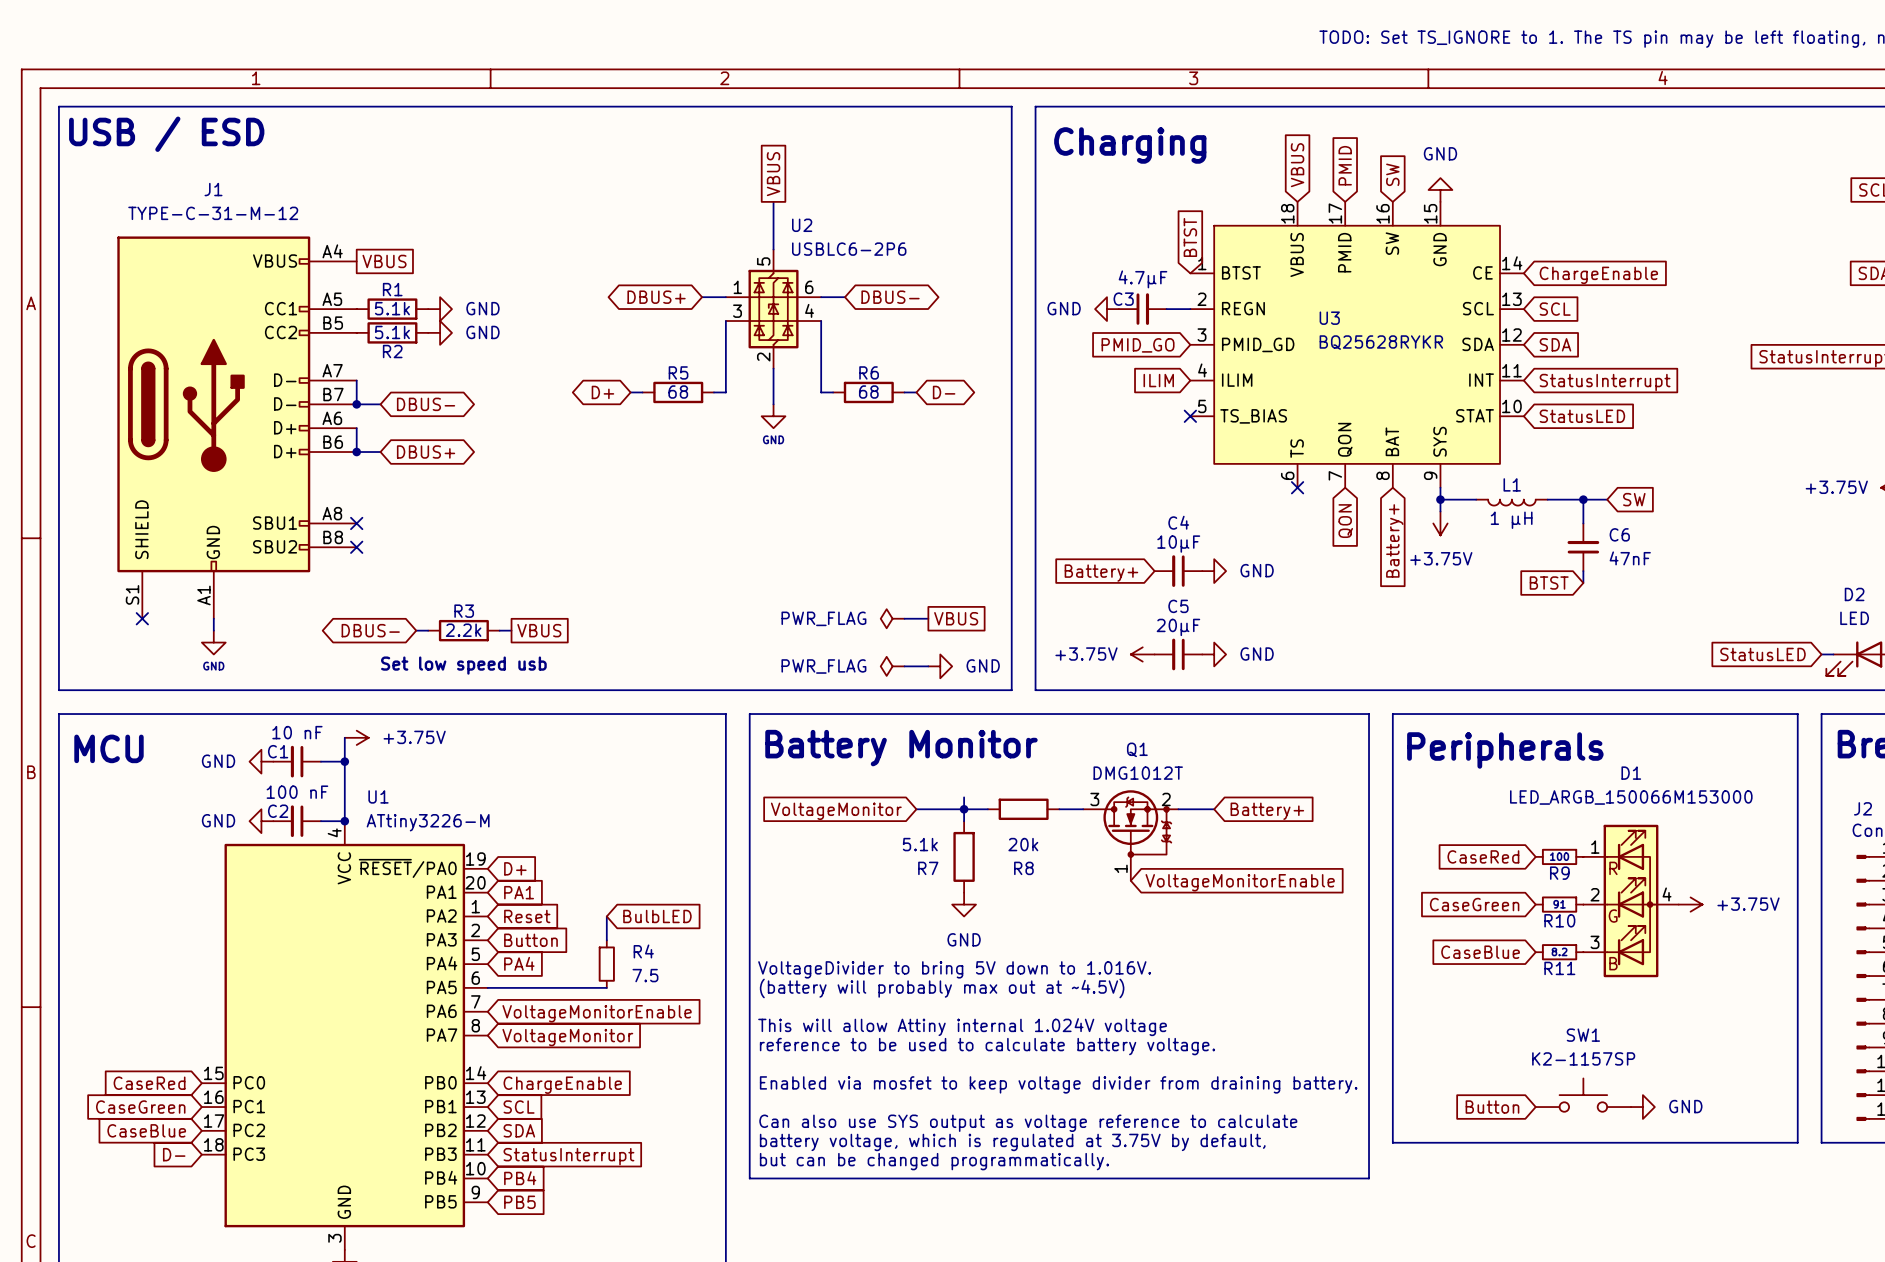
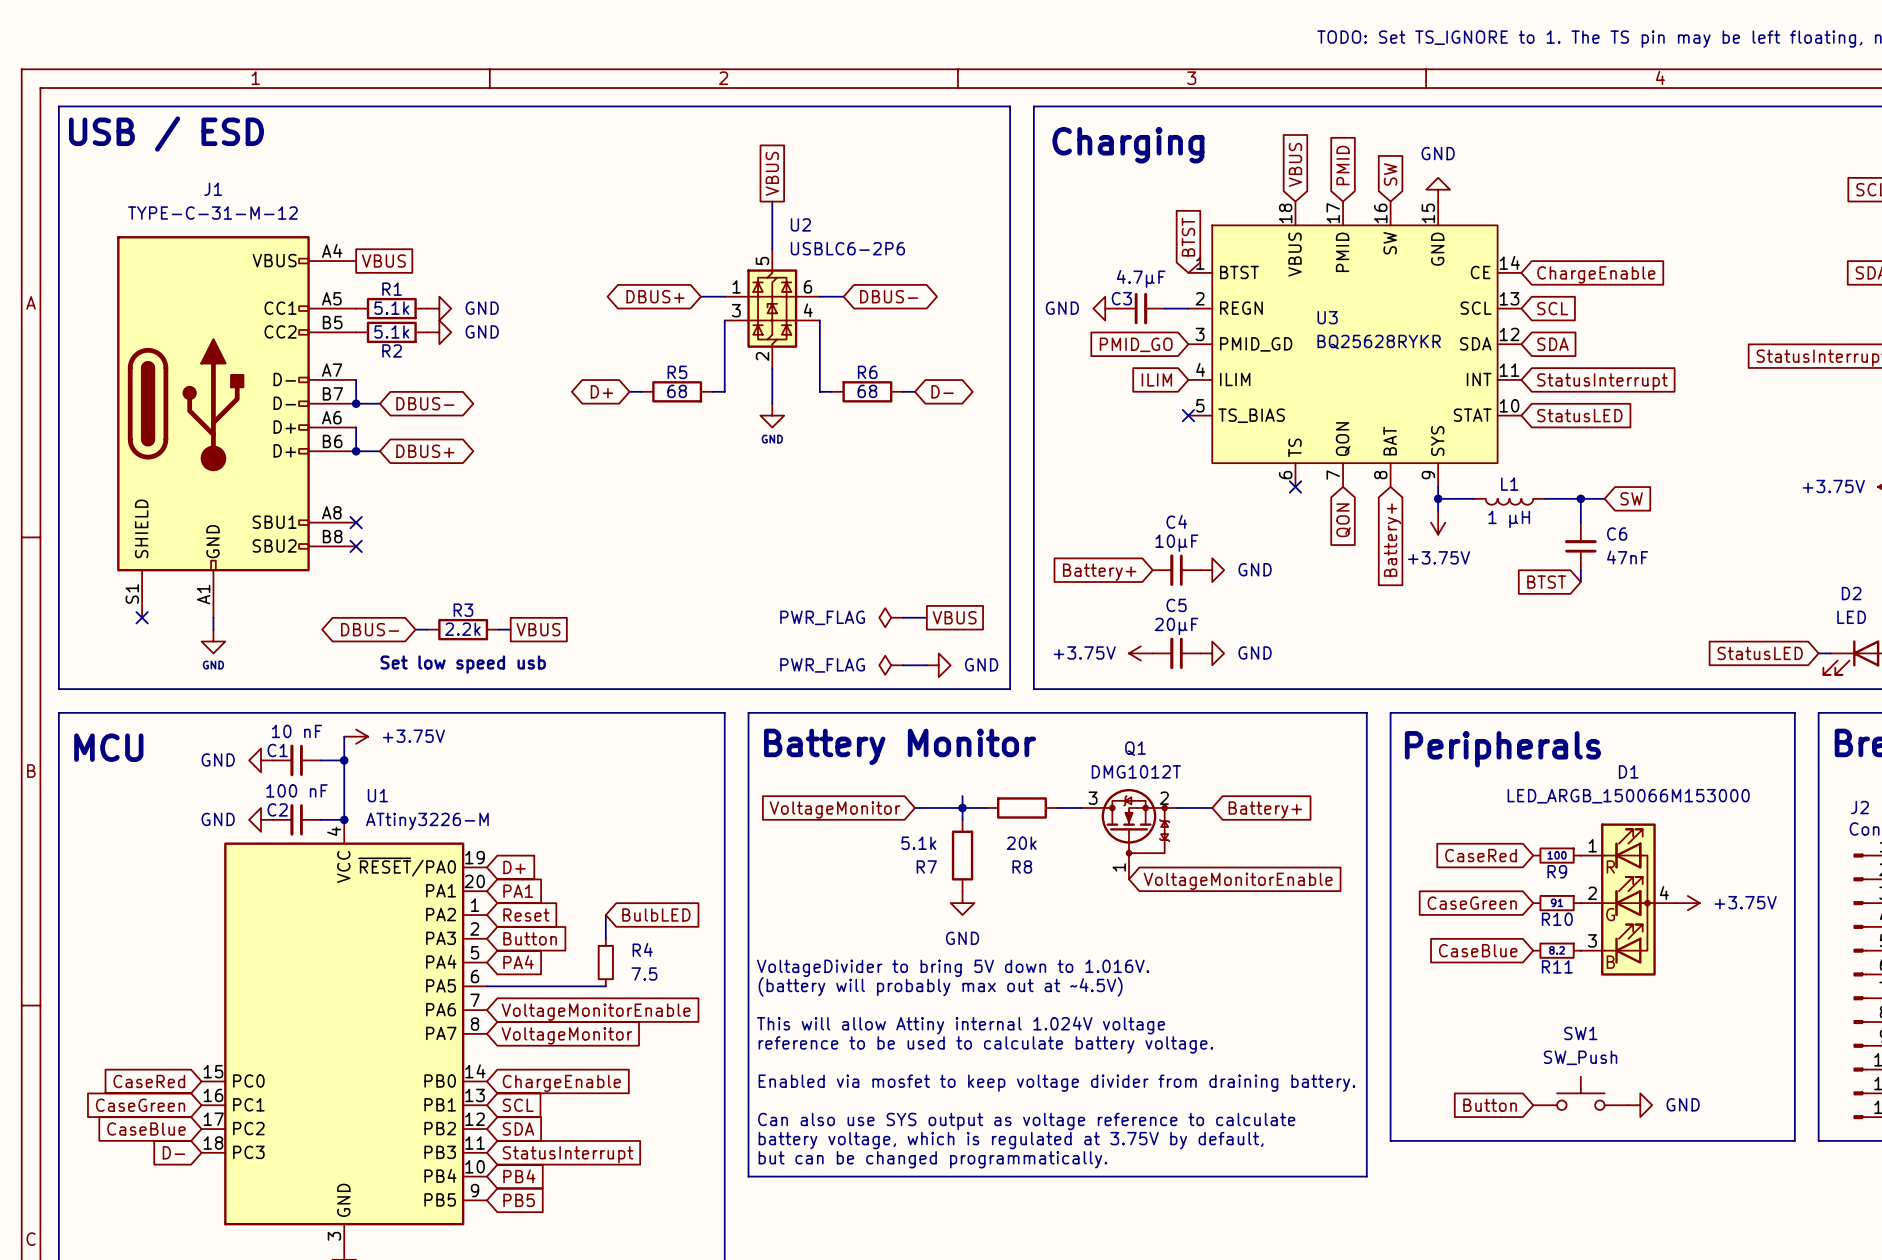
SW1 value: K2-1157SP (1583, 1058) -> SW_Push (1580, 1057)

